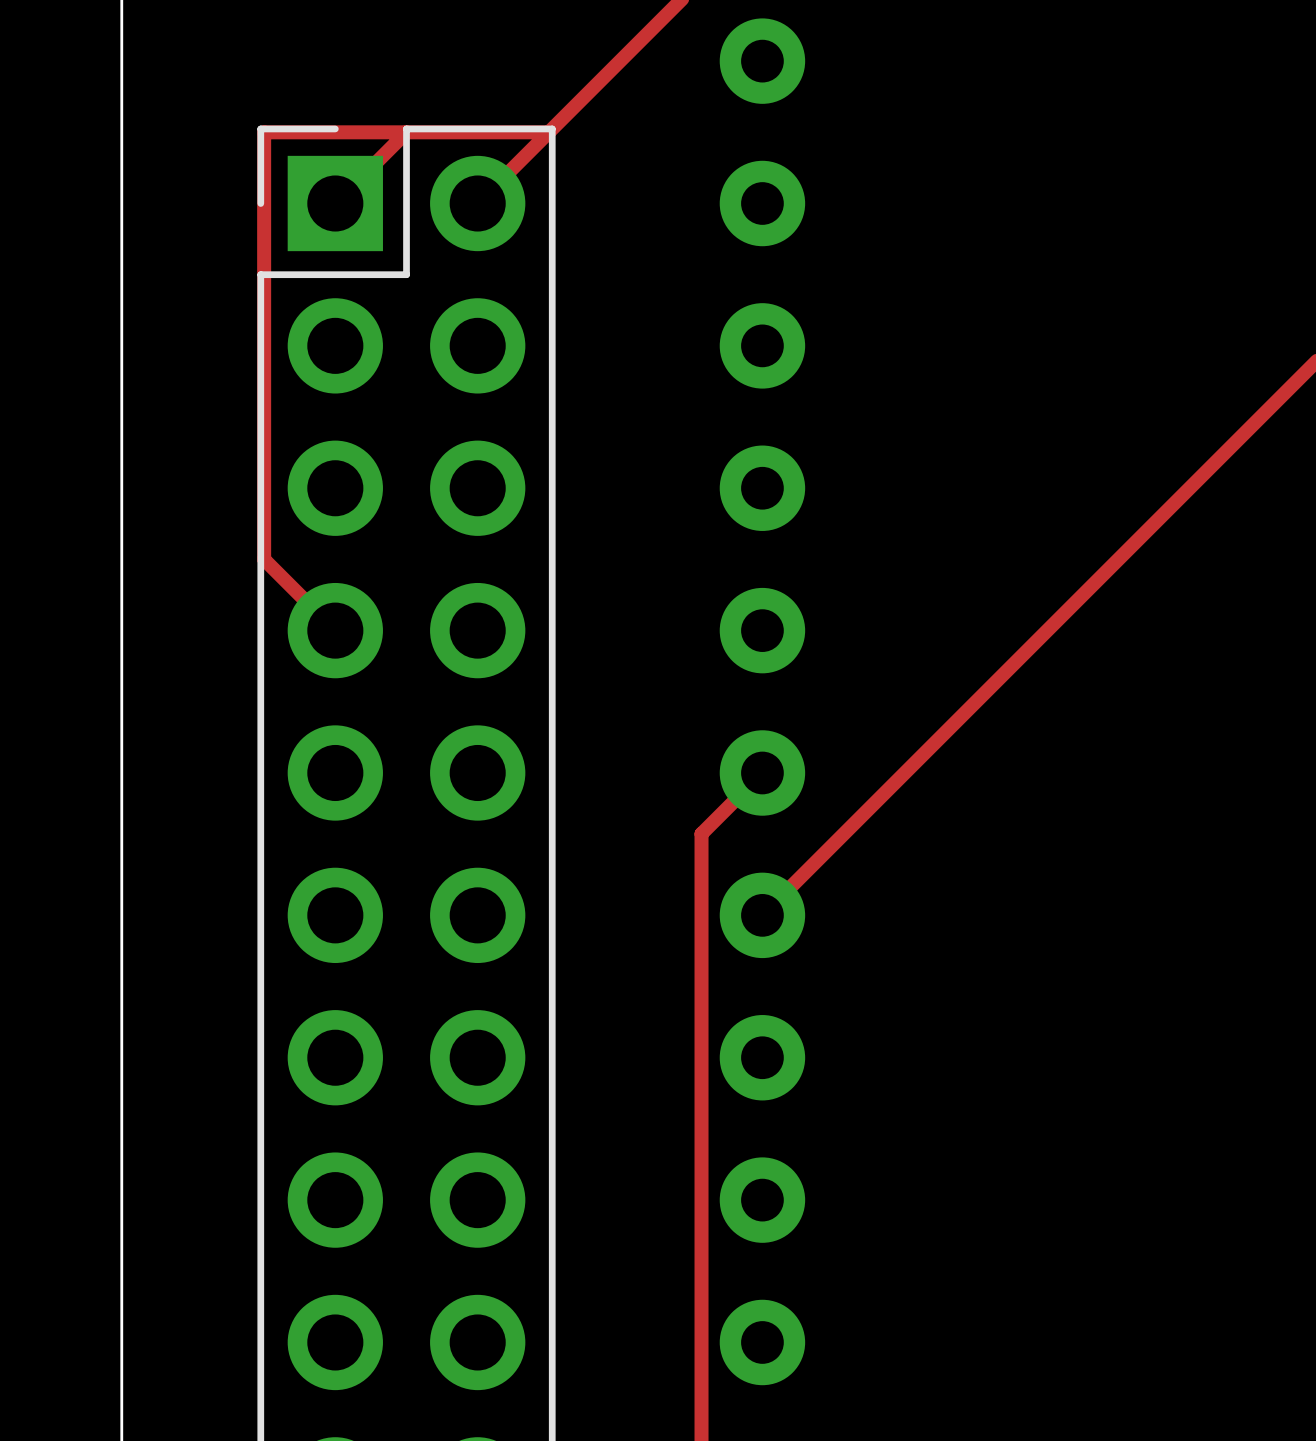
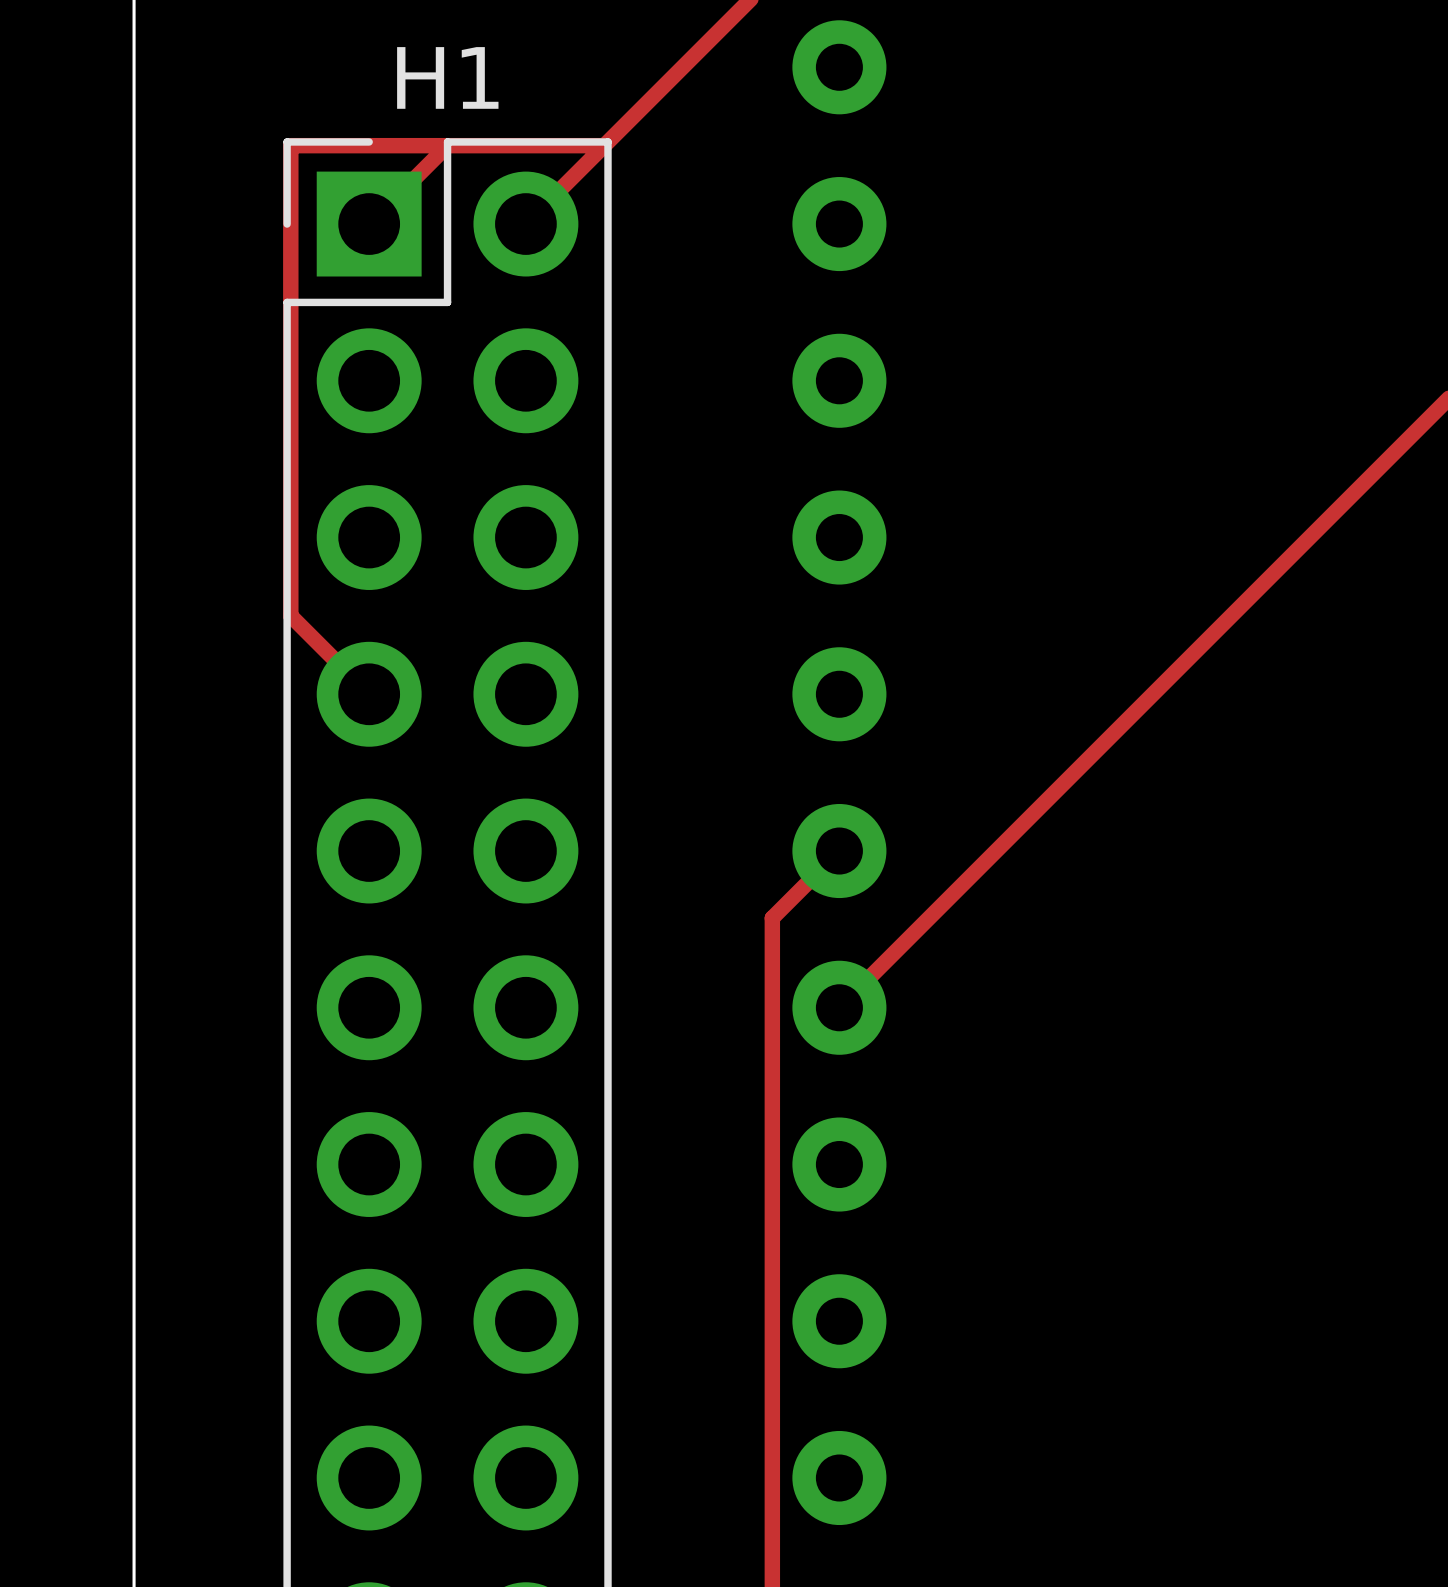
H1 name: none -> H1 (447, 77)

